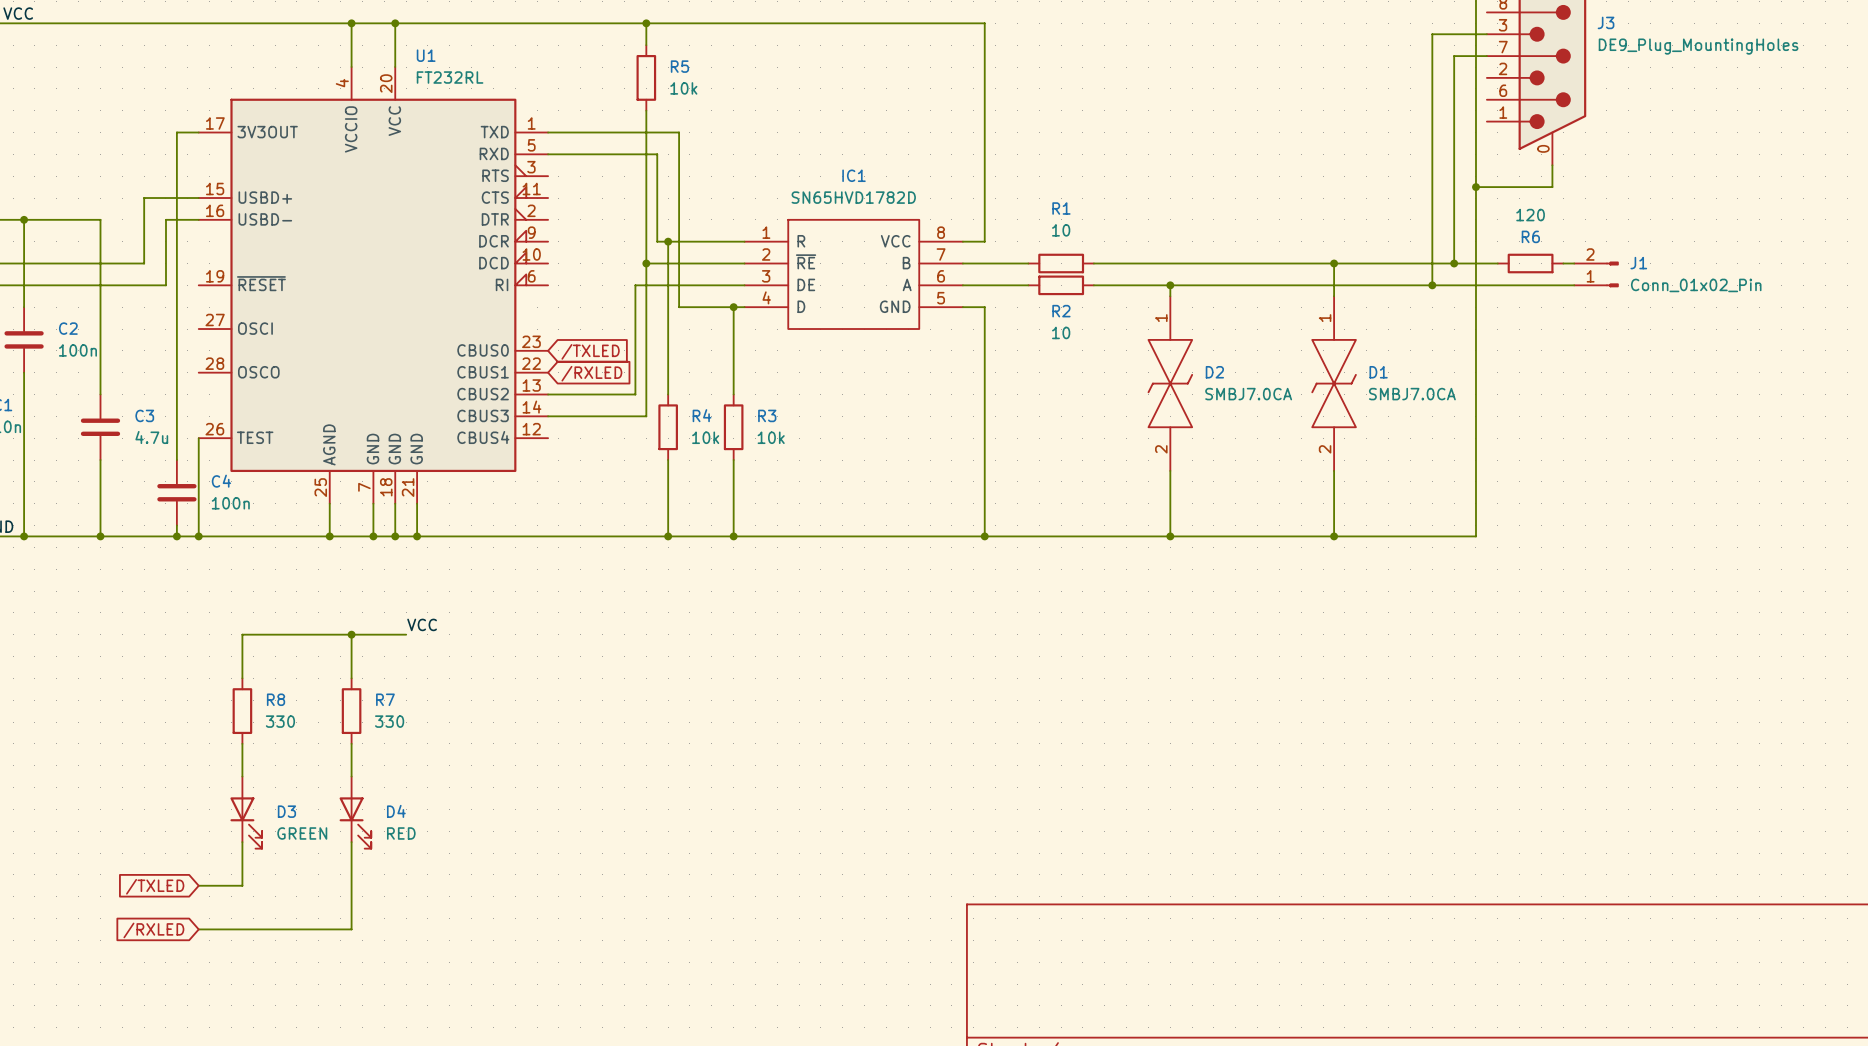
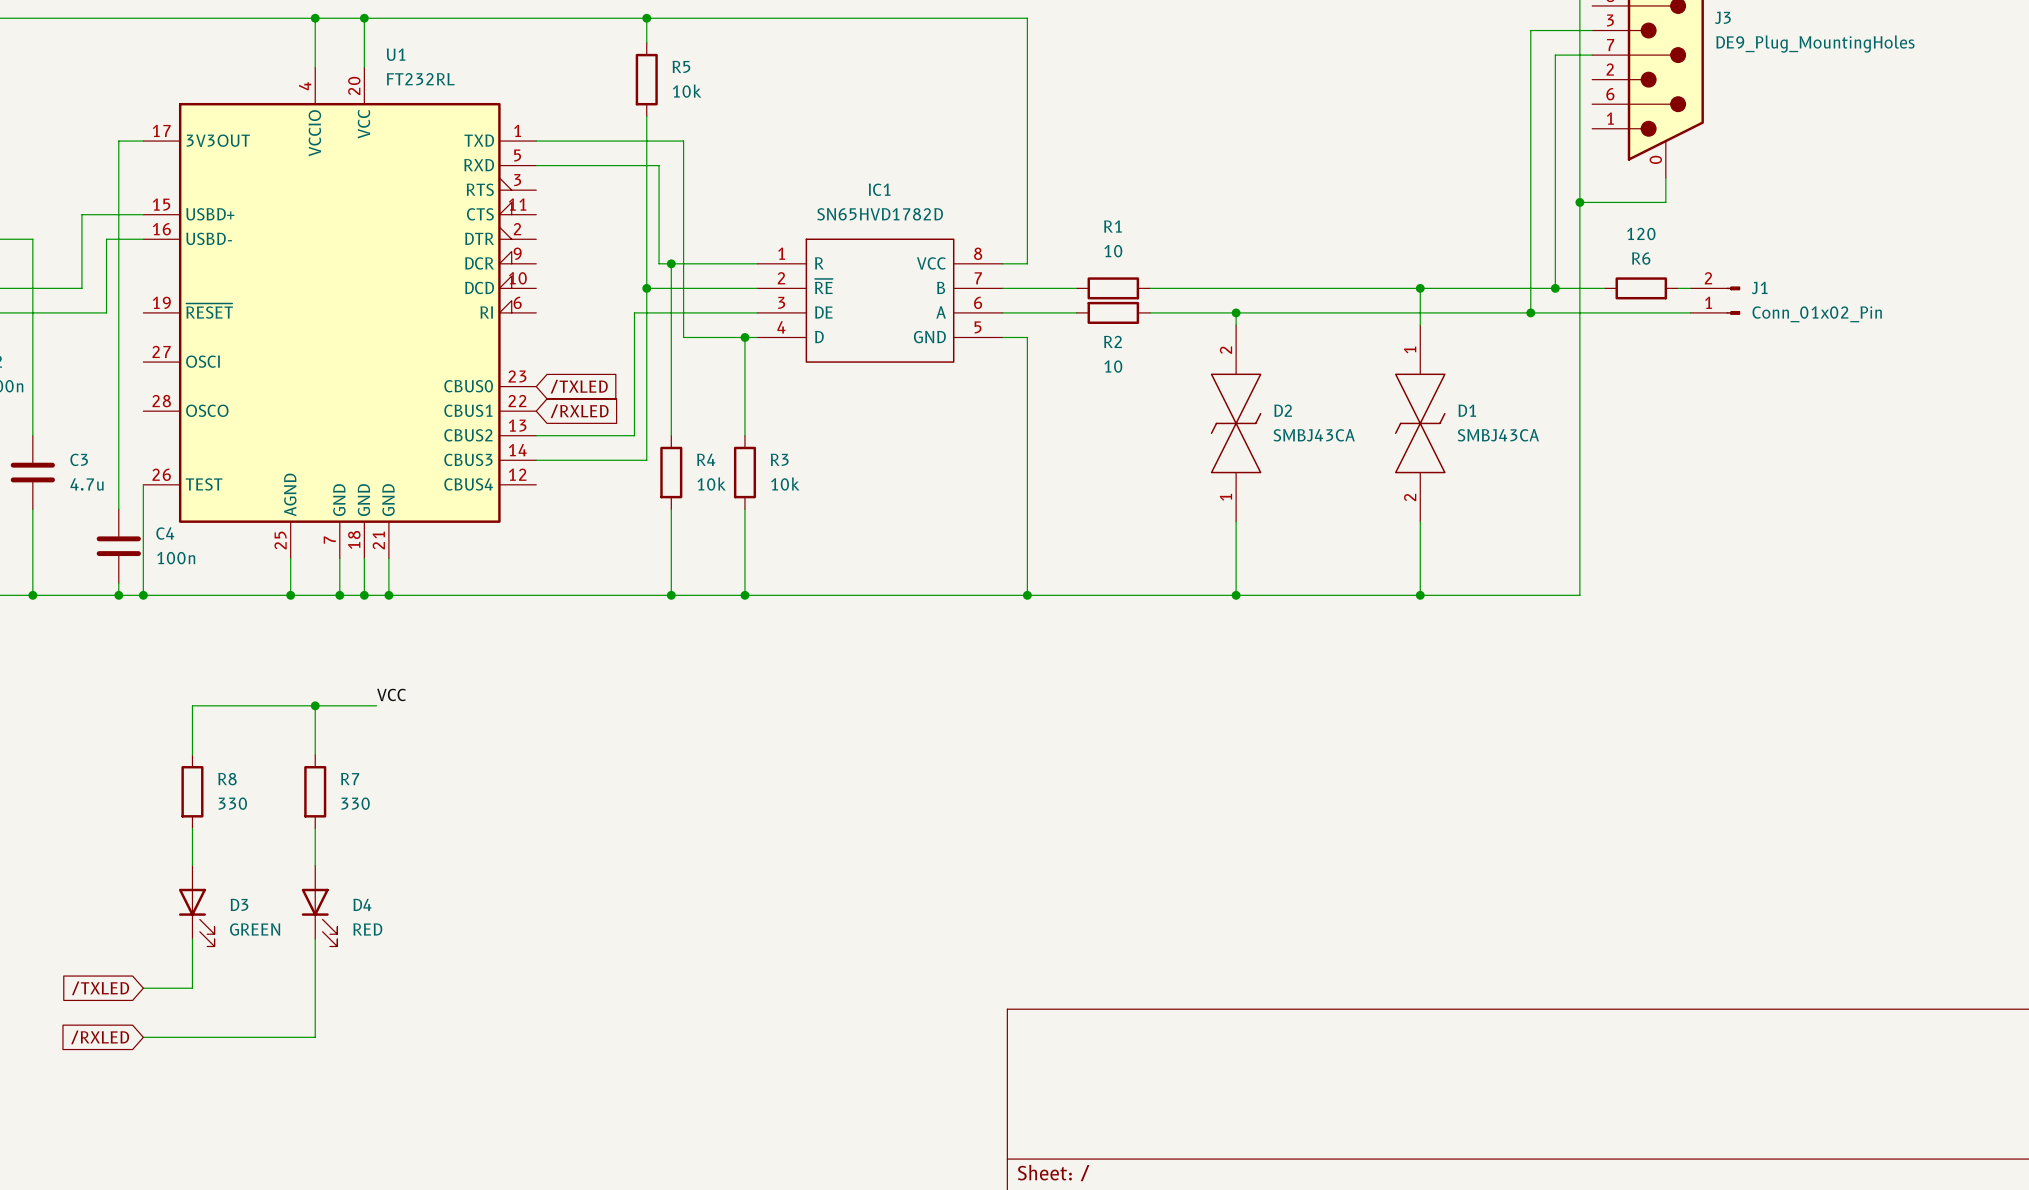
D2 rotation: 0° (1170, 383) -> 180° (1236, 423)
D2 value: SMBJ7.0CA (1248, 394) -> SMBJ43CA (1314, 435)
D1 value: SMBJ7.0CA (1412, 394) -> SMBJ43CA (1498, 435)

